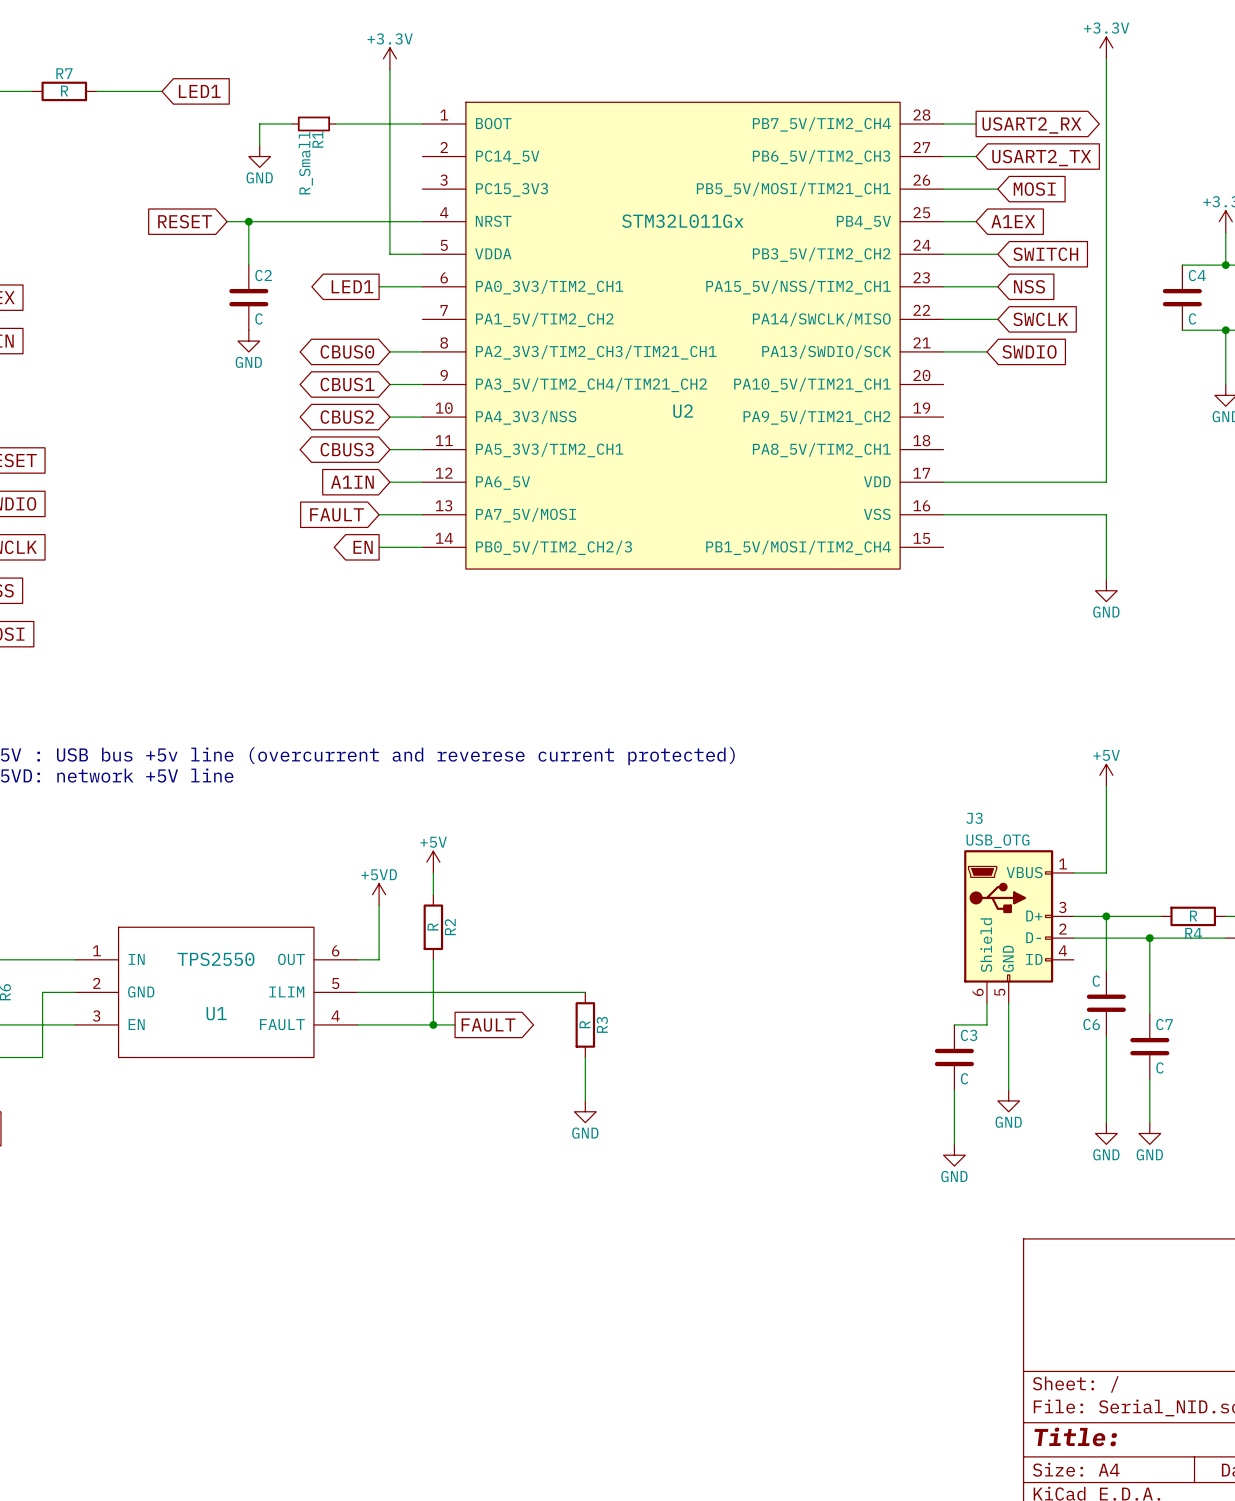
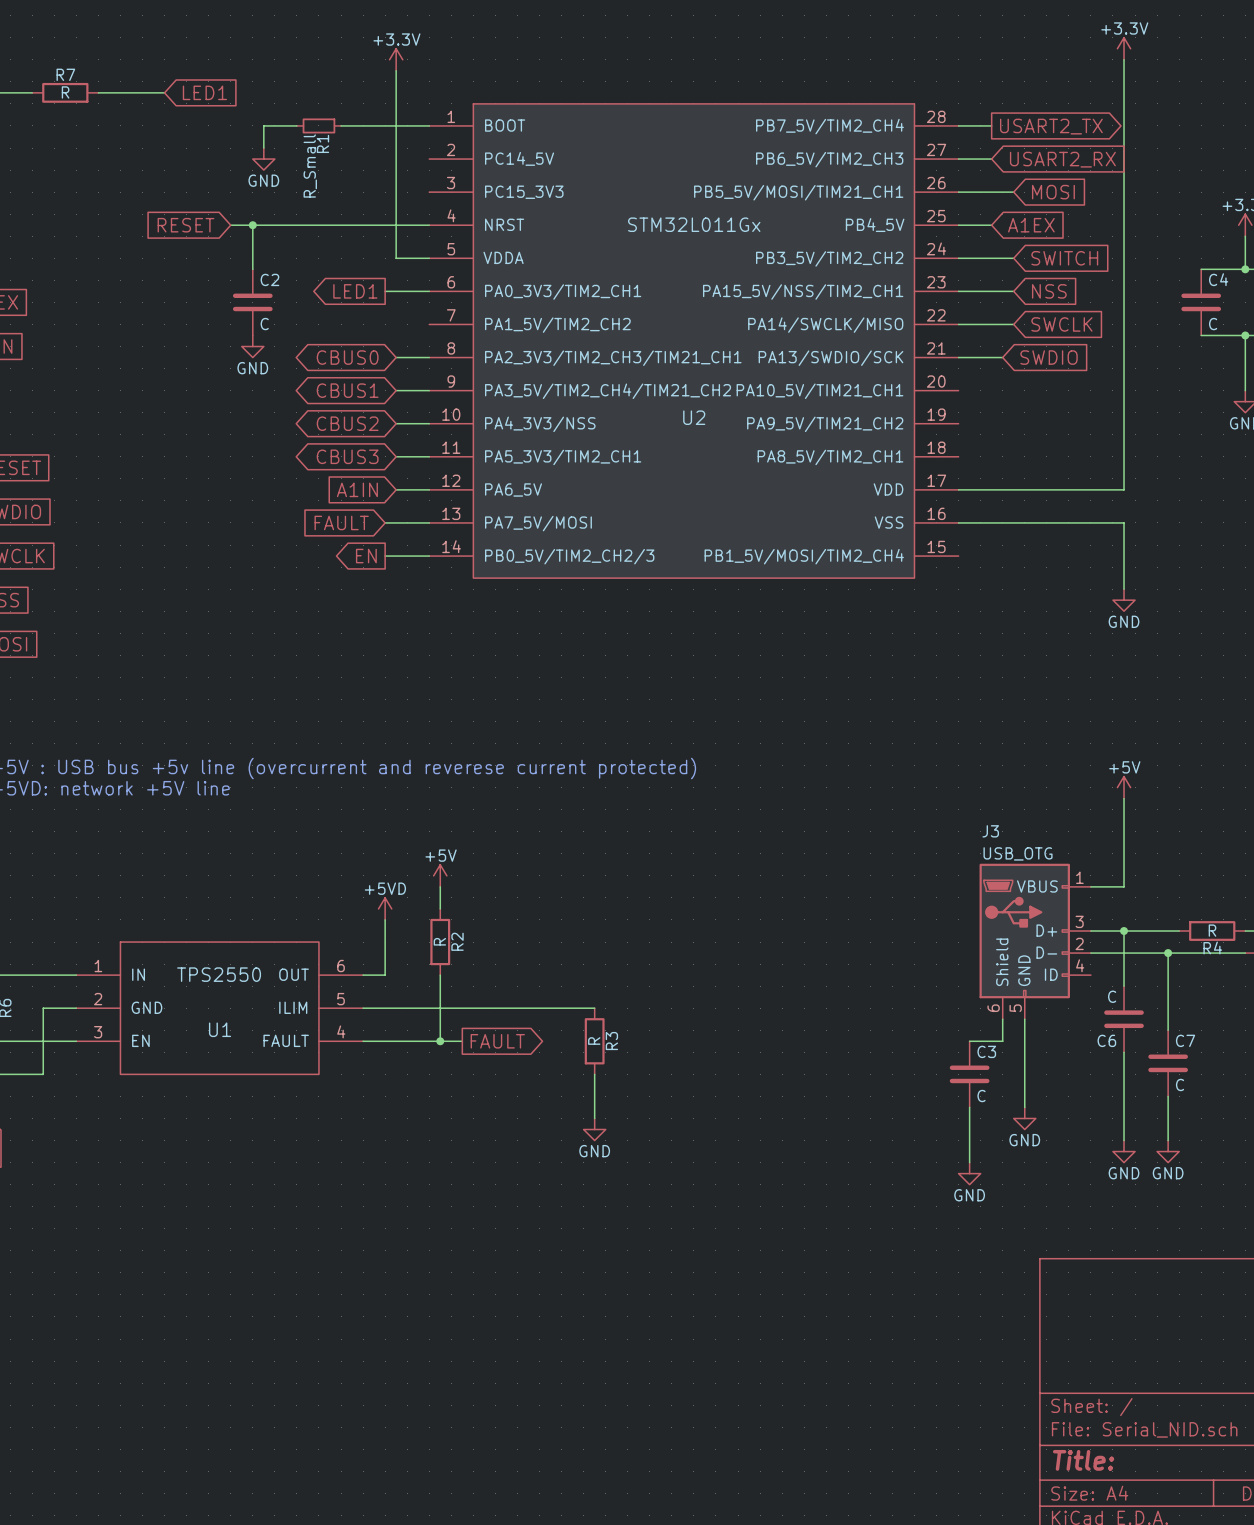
global label: USART2_RX (1031, 125) -> USART2_TX (1051, 126)
global label: USART2_TX (1041, 158) -> USART2_RX (1062, 159)

